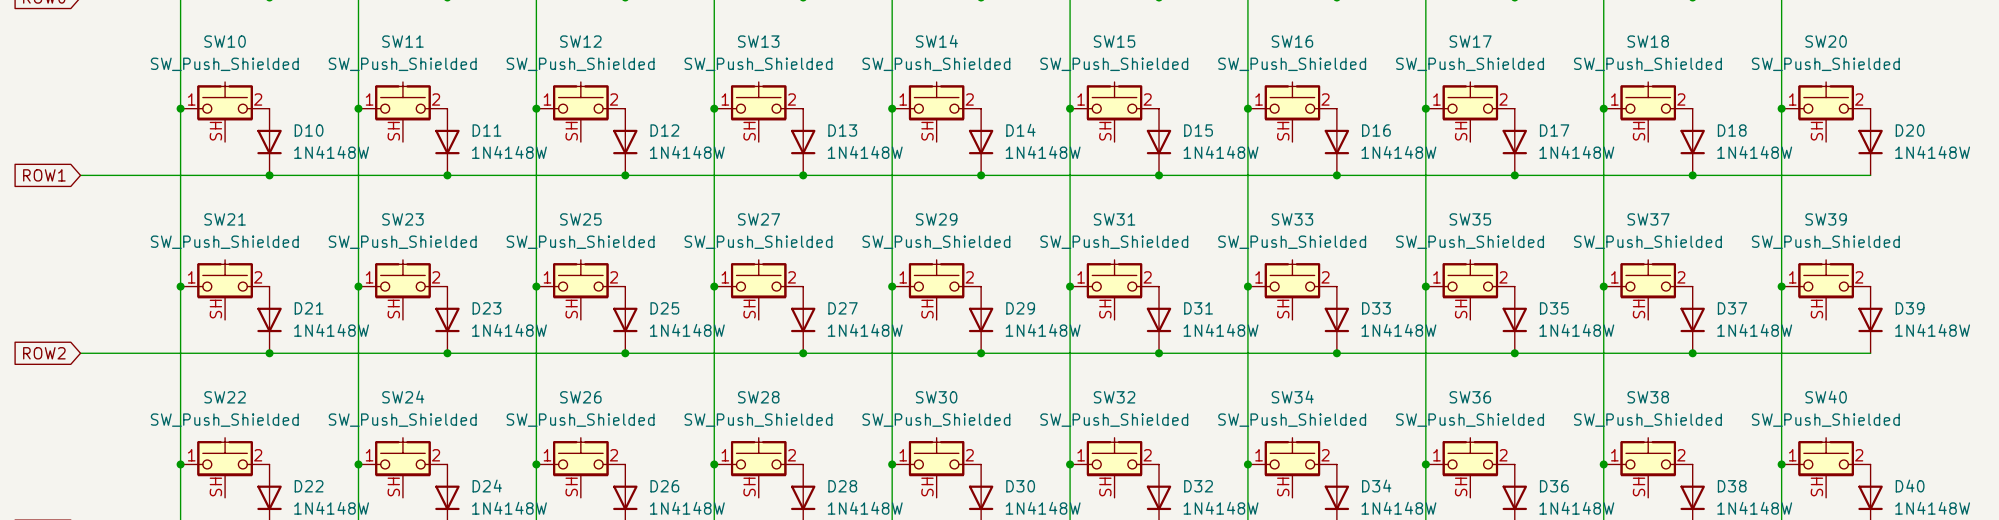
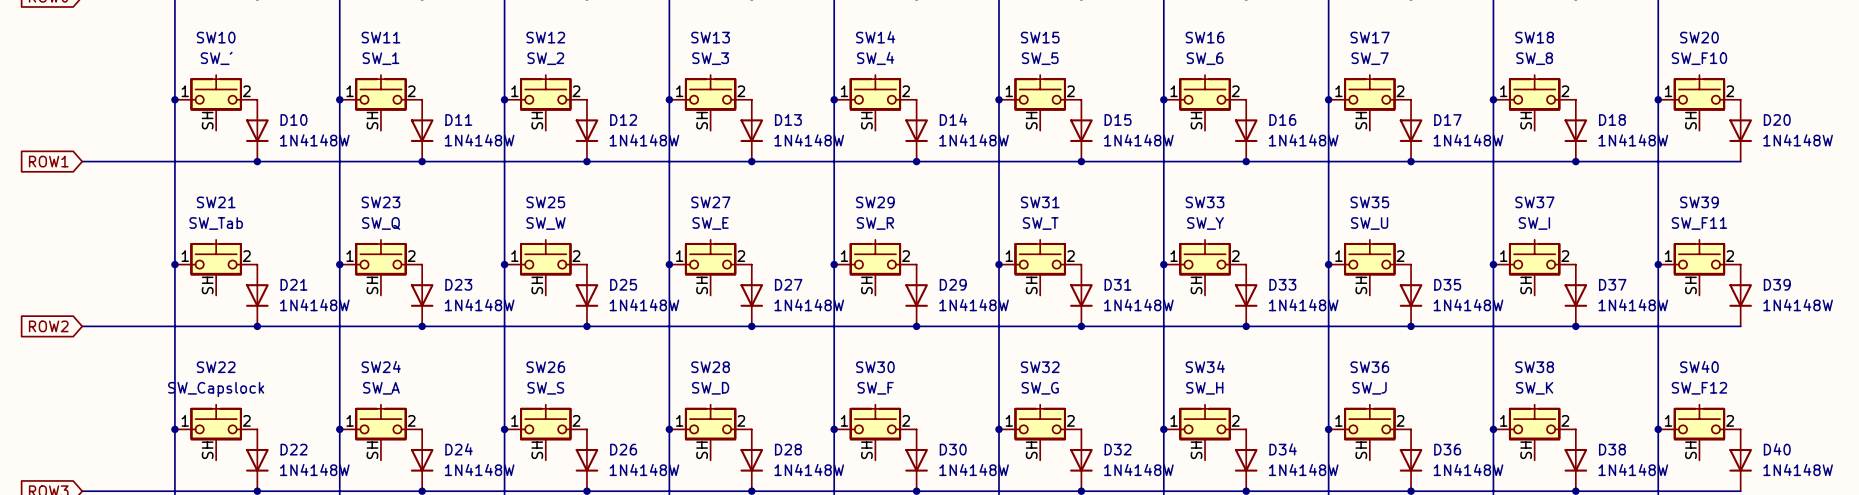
SW10 value: SW_Push_Shielded (224, 64) -> SW_´ (216, 58)
SW11 value: SW_Push_Shielded (402, 64) -> SW_1 (380, 58)
SW12 value: SW_Push_Shielded (580, 64) -> SW_2 (545, 58)
SW13 value: SW_Push_Shielded (758, 64) -> SW_3 (710, 58)
SW14 value: SW_Push_Shielded (936, 64) -> SW_4 (875, 58)
SW15 value: SW_Push_Shielded (1114, 64) -> SW_5 (1040, 58)
SW16 value: SW_Push_Shielded (1292, 64) -> SW_6 (1205, 58)
SW17 value: SW_Push_Shielded (1470, 64) -> SW_7 (1370, 58)
SW18 value: SW_Push_Shielded (1647, 64) -> SW_8 (1534, 58)
SW20 value: SW_Push_Shielded (1825, 64) -> SW_F10 (1699, 58)
SW21 value: SW_Push_Shielded (224, 242) -> SW_Tab (216, 223)
SW23 value: SW_Push_Shielded (402, 242) -> SW_Q (381, 223)
SW25 value: SW_Push_Shielded (580, 242) -> SW_W (546, 223)
SW27 value: SW_Push_Shielded (758, 242) -> SW_E (710, 223)
SW29 value: SW_Push_Shielded (936, 242) -> SW_R (875, 223)
SW31 value: SW_Push_Shielded (1114, 242) -> SW_T (1040, 223)
SW33 value: SW_Push_Shielded (1292, 242) -> SW_Y (1205, 223)
SW35 value: SW_Push_Shielded (1470, 242) -> SW_U (1369, 223)
SW37 value: SW_Push_Shielded (1647, 242) -> SW_I (1534, 223)
SW39 value: SW_Push_Shielded (1825, 242) -> SW_F11 (1699, 223)
SW22 value: SW_Push_Shielded (224, 420) -> SW_Capslock (216, 389)
SW24 value: SW_Push_Shielded (402, 420) -> SW_A (381, 388)
SW26 value: SW_Push_Shielded (580, 420) -> SW_S (545, 388)
SW28 value: SW_Push_Shielded (758, 420) -> SW_D (710, 388)
SW30 value: SW_Push_Shielded (936, 420) -> SW_F (875, 388)
SW32 value: SW_Push_Shielded (1114, 420) -> SW_G (1040, 388)
SW34 value: SW_Push_Shielded (1292, 420) -> SW_H (1204, 388)
SW36 value: SW_Push_Shielded (1470, 420) -> SW_J (1369, 388)
SW38 value: SW_Push_Shielded (1647, 420) -> SW_K (1534, 388)
SW40 value: SW_Push_Shielded (1825, 420) -> SW_F12 (1699, 388)

